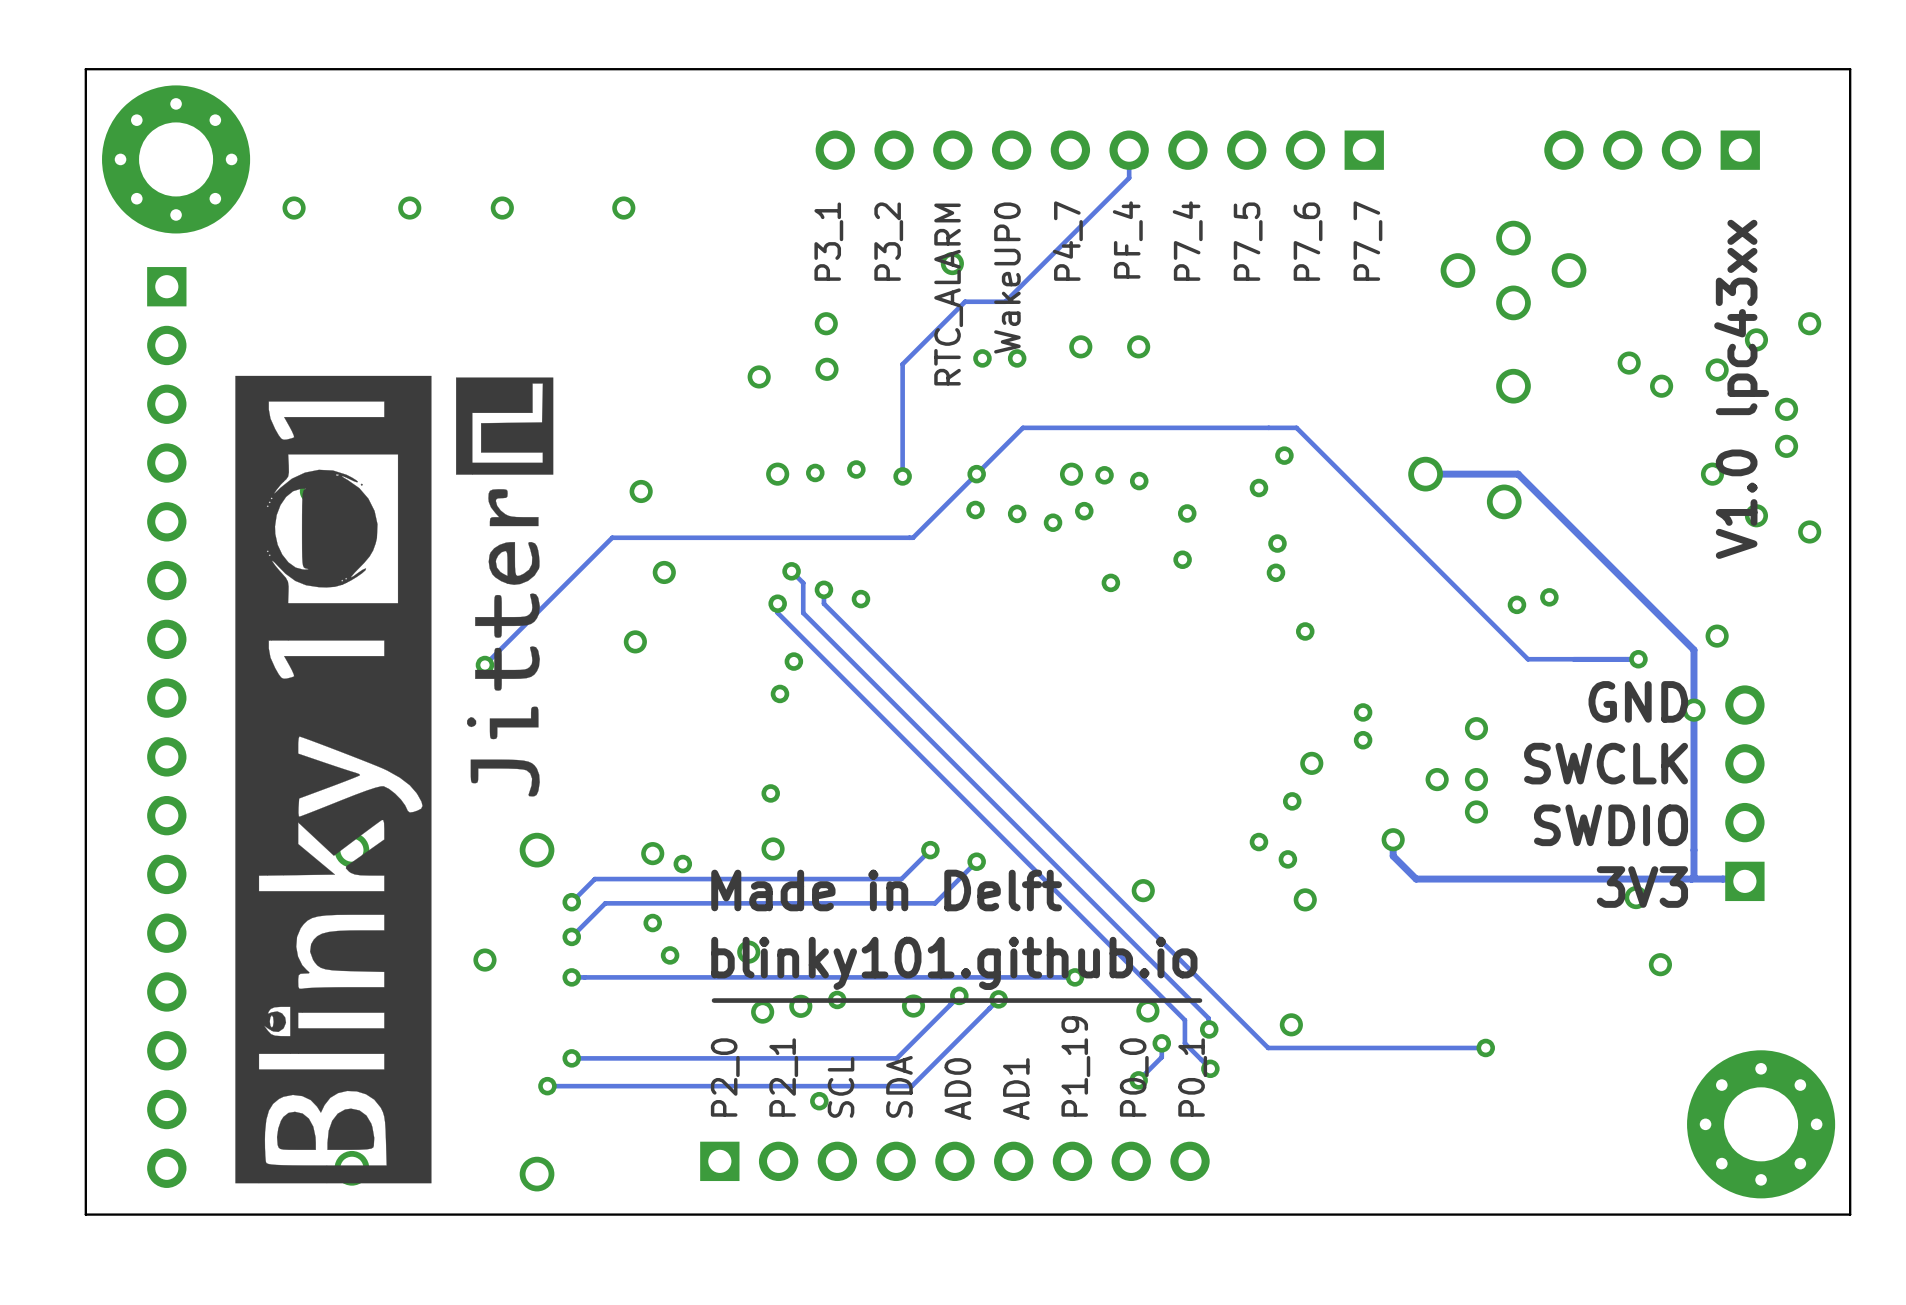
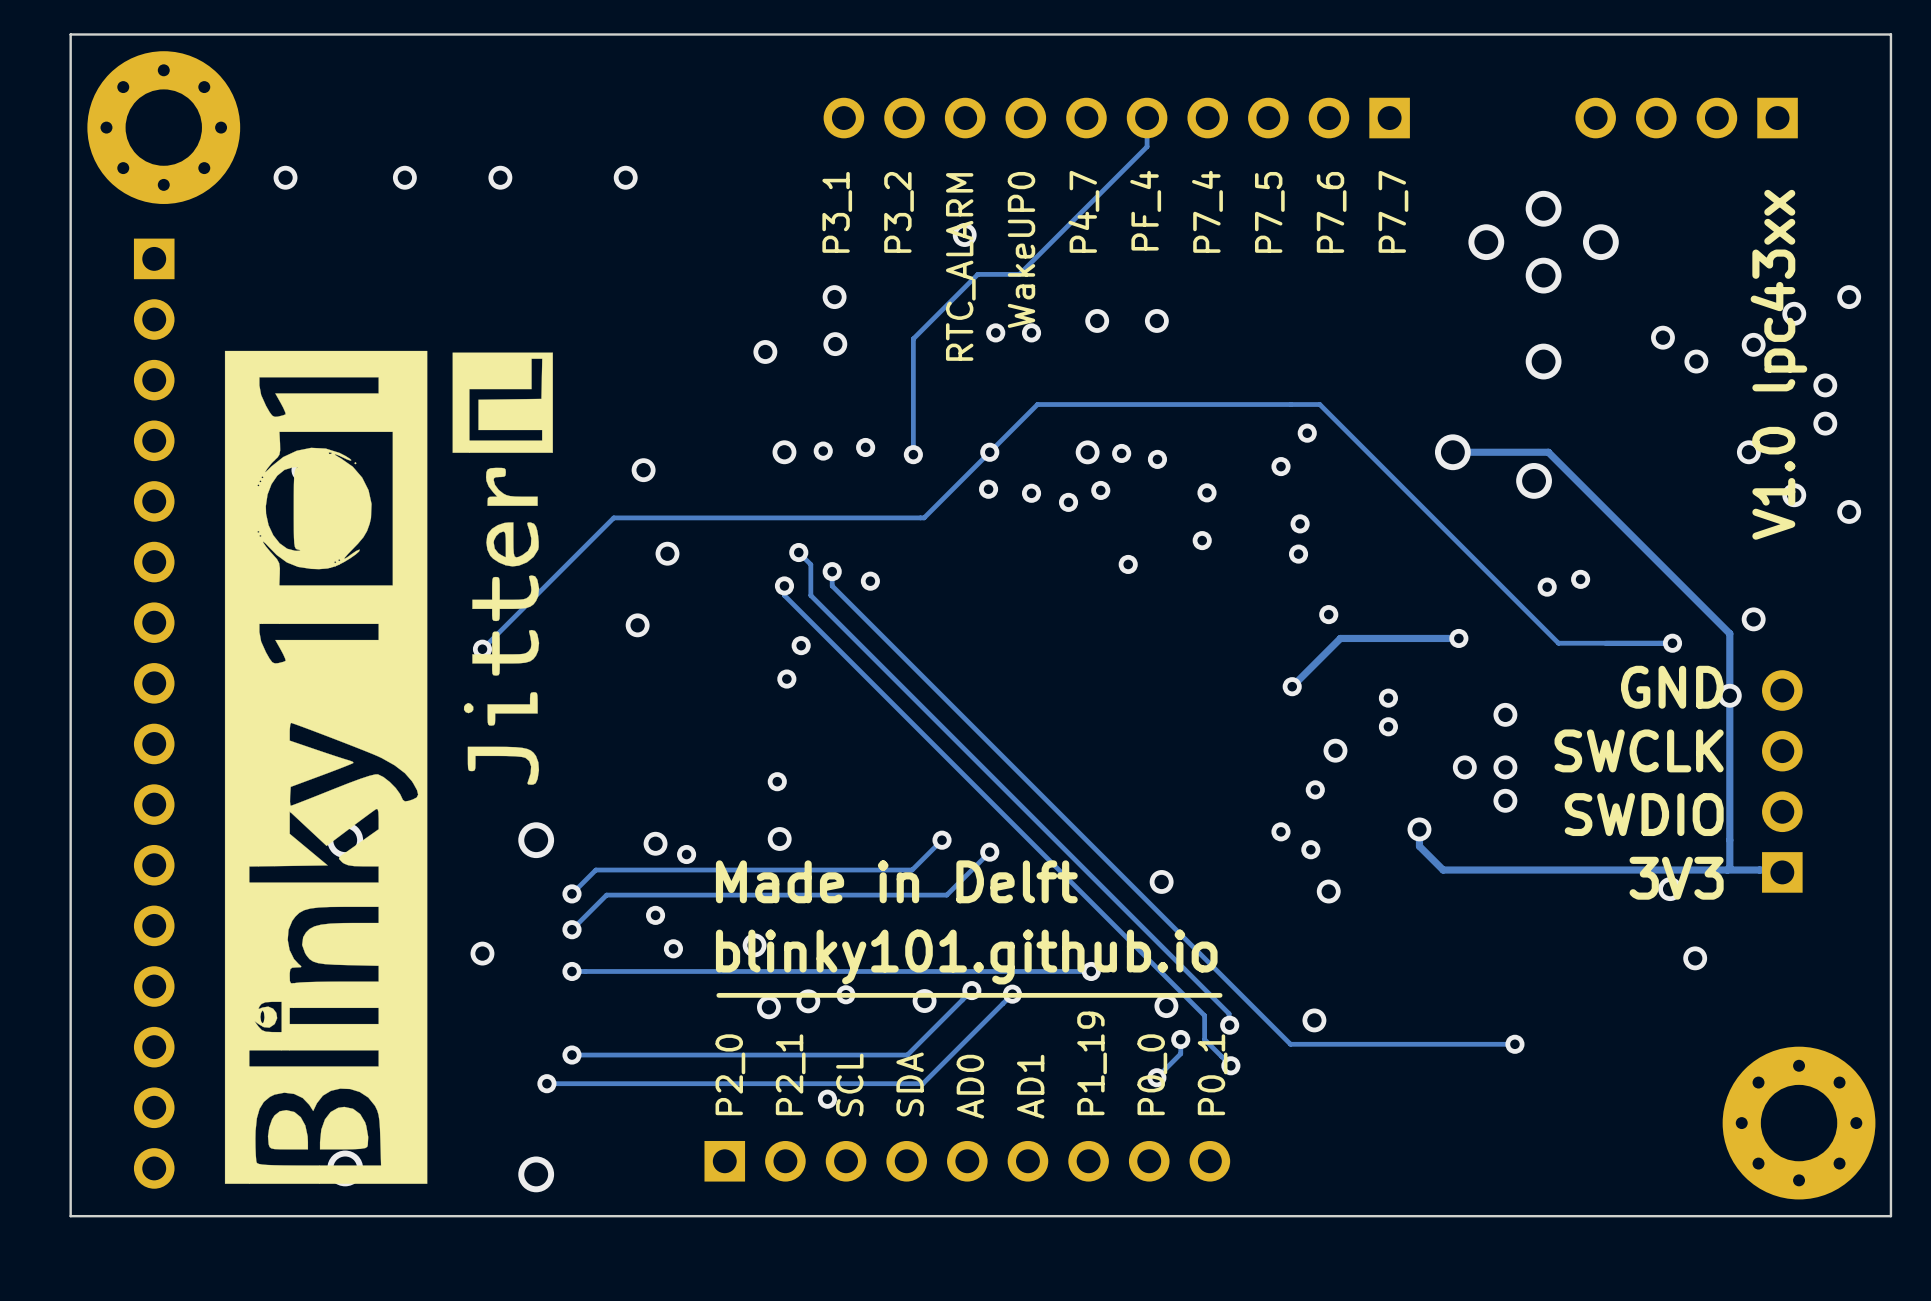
track: none -> (1458, 638) (1340, 638) (1292, 686)
via: none -> (1458, 638)
via: none -> (1292, 686)

